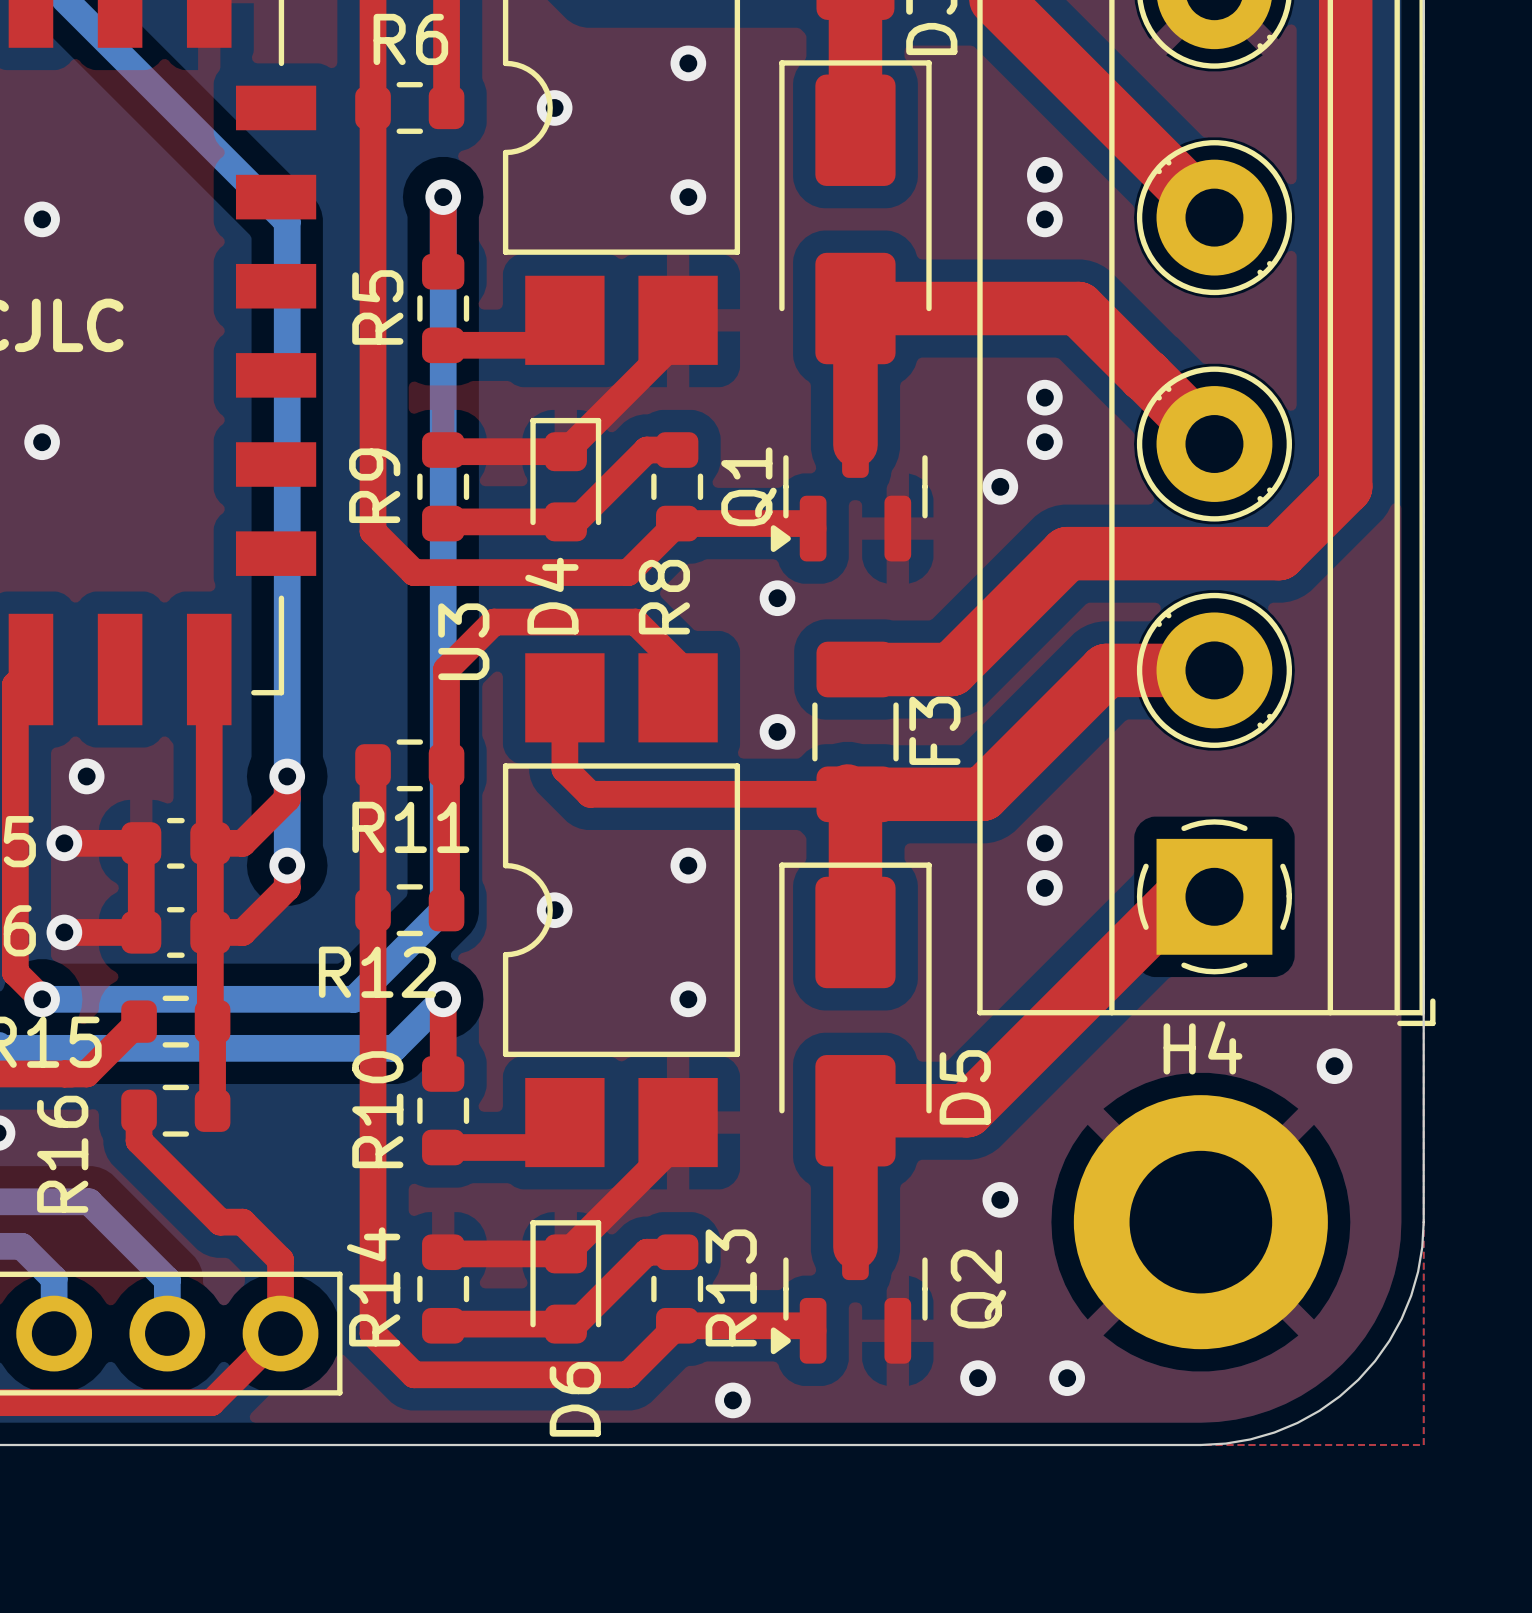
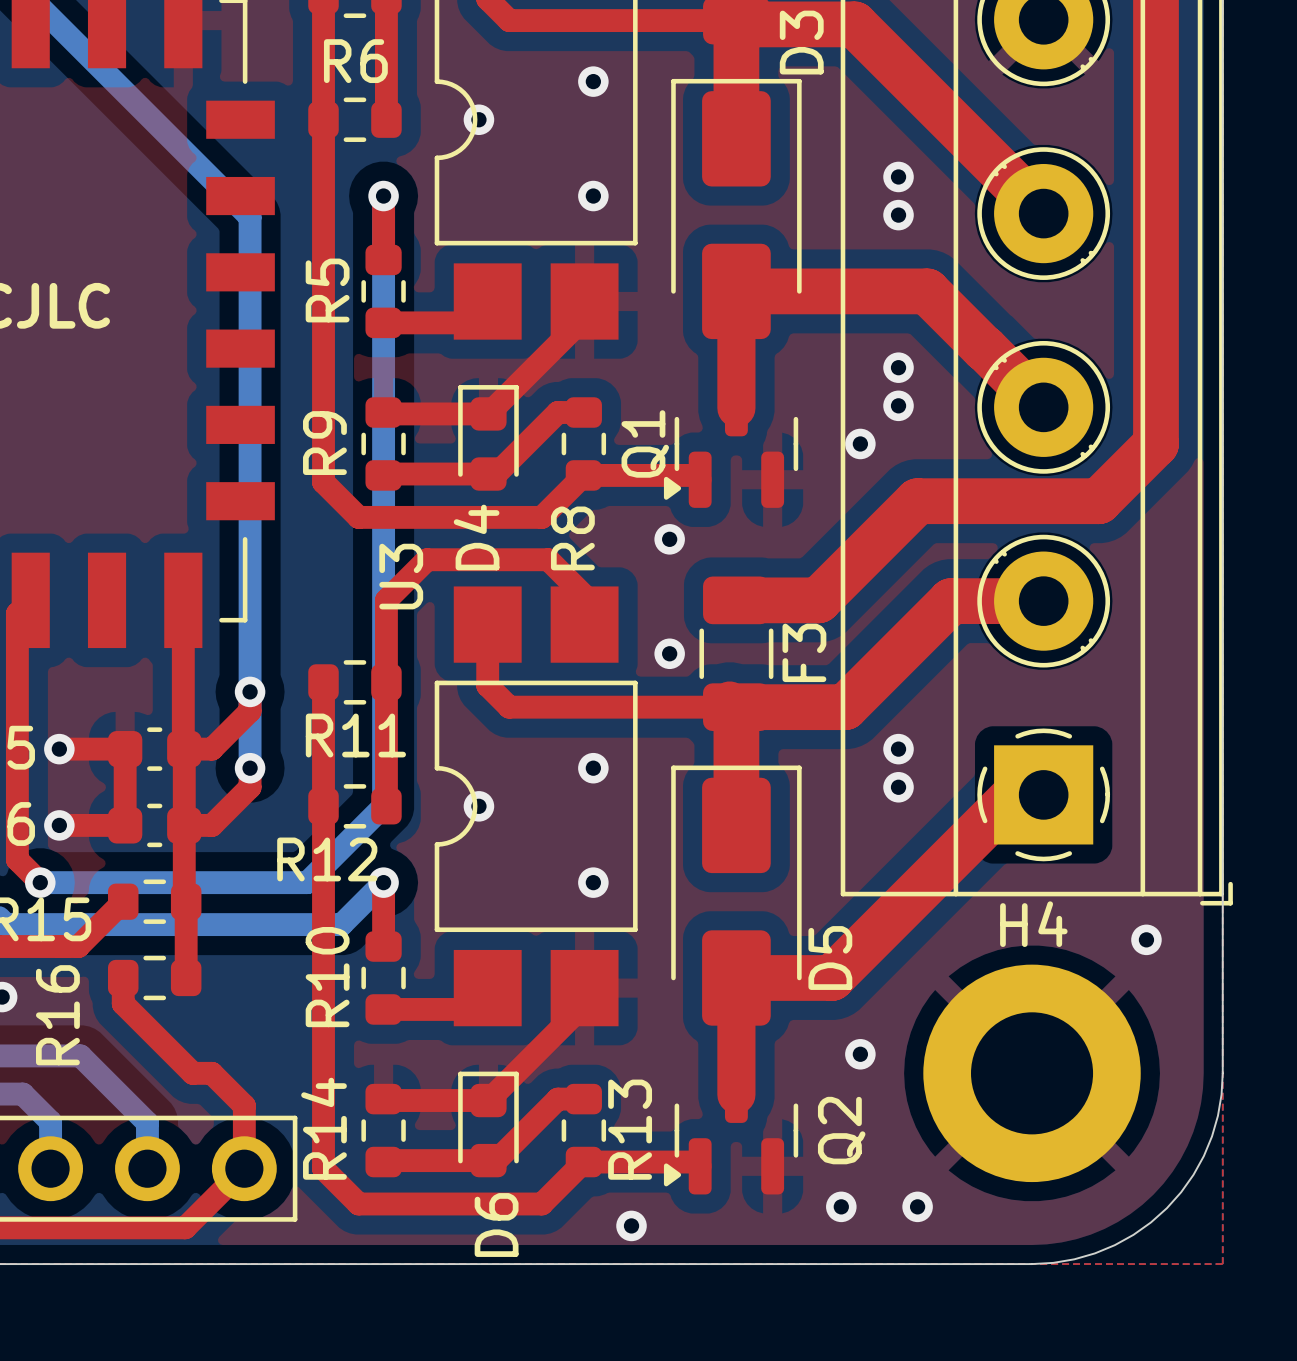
via: (42, 219) -> none
via: (42, 442) -> none
via: (86, 776) -> none

